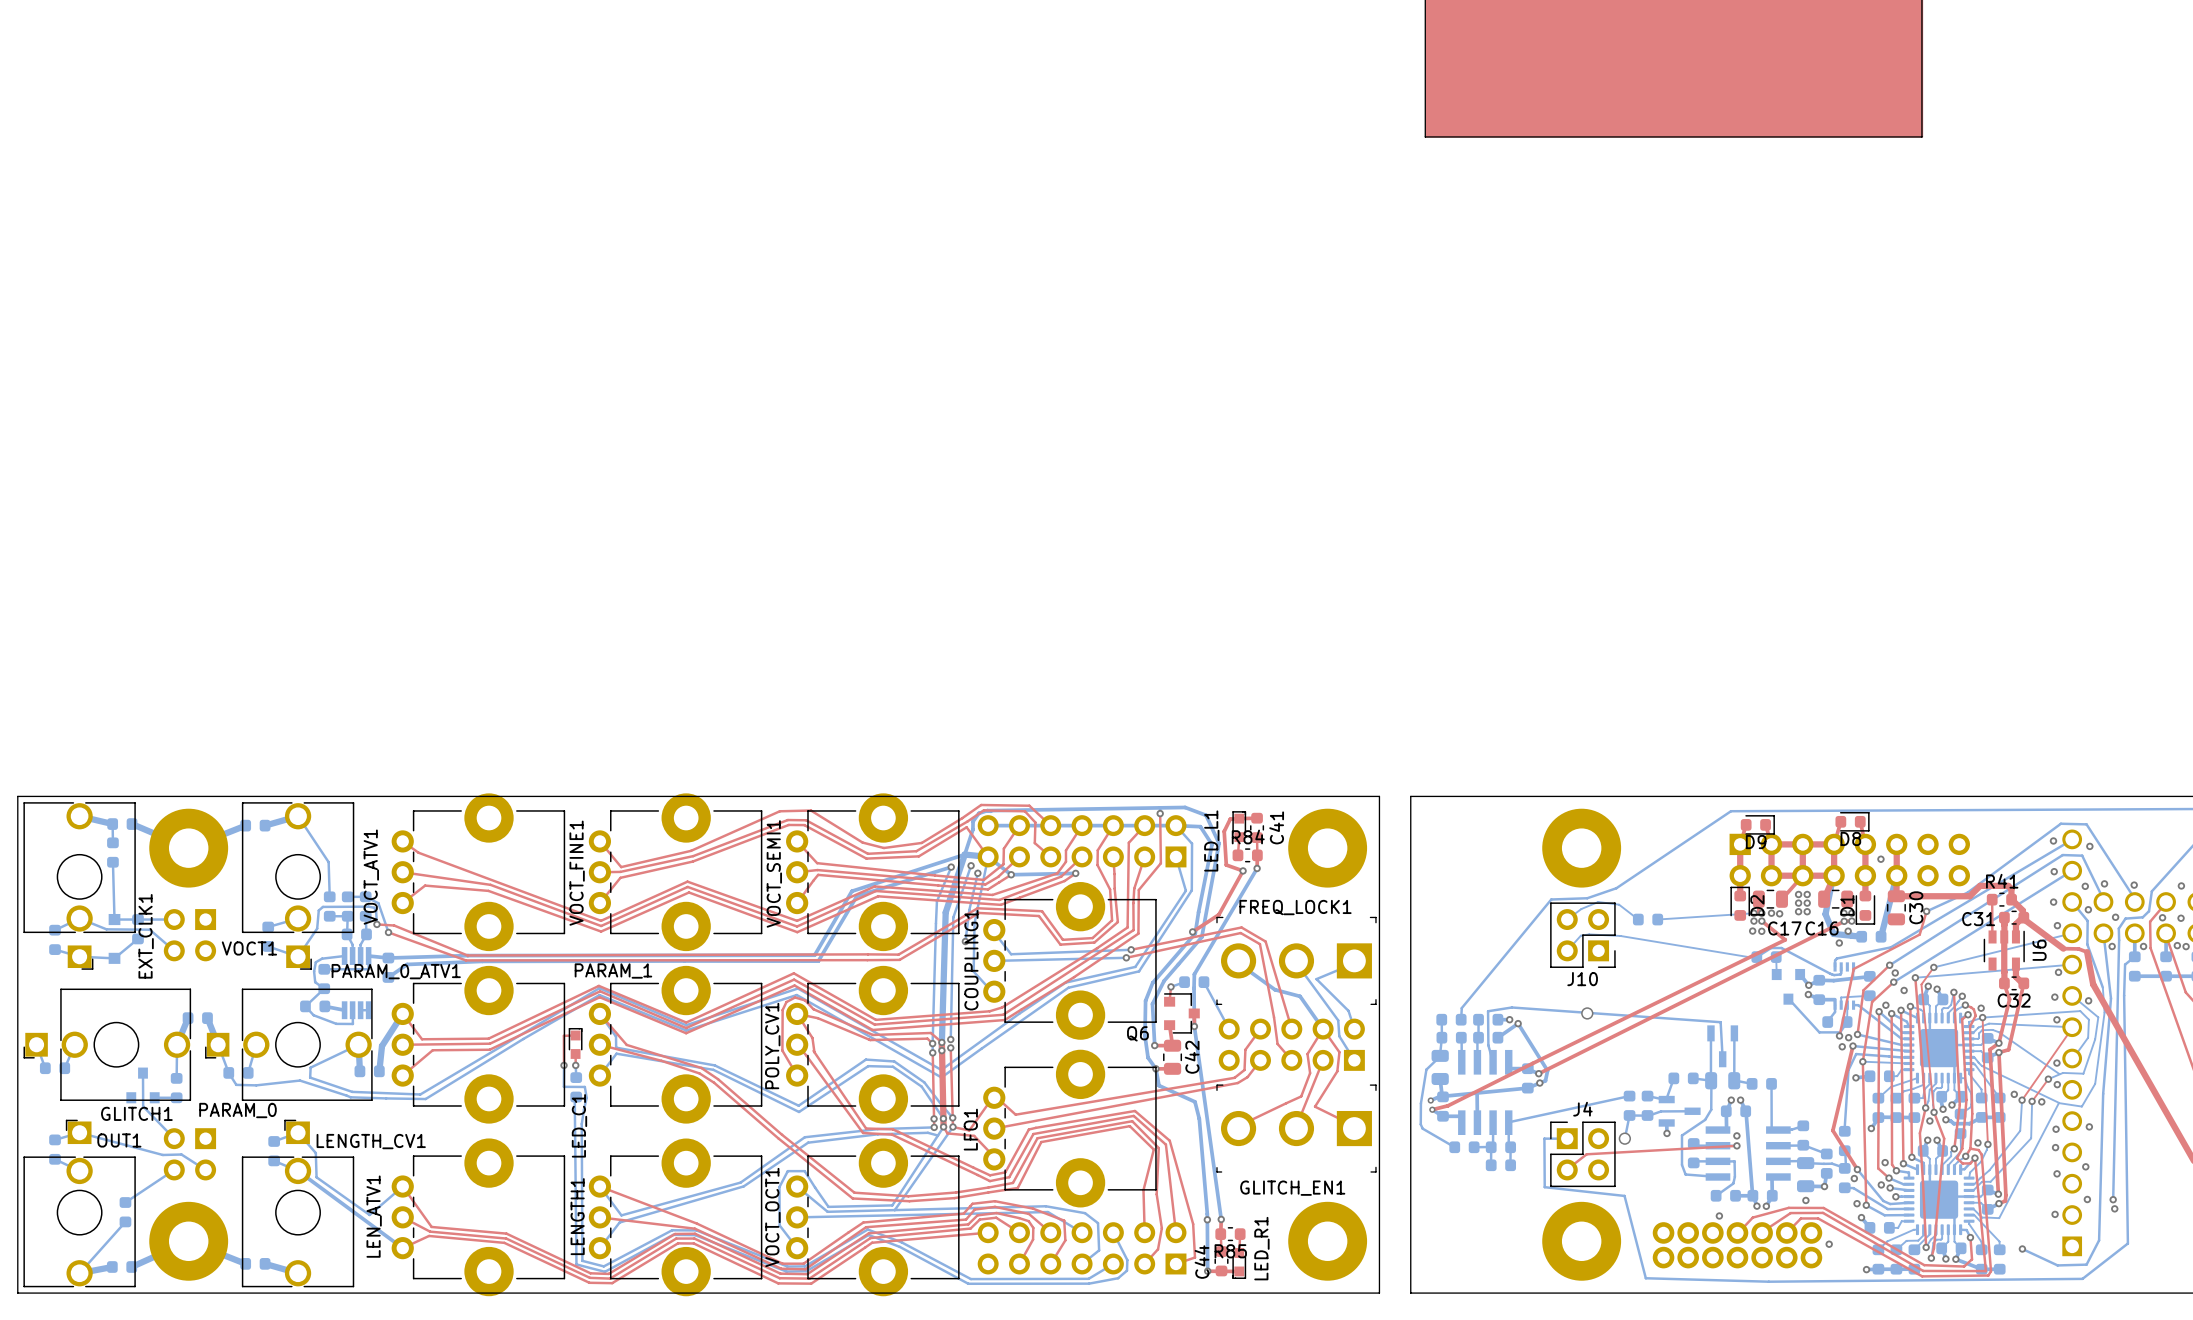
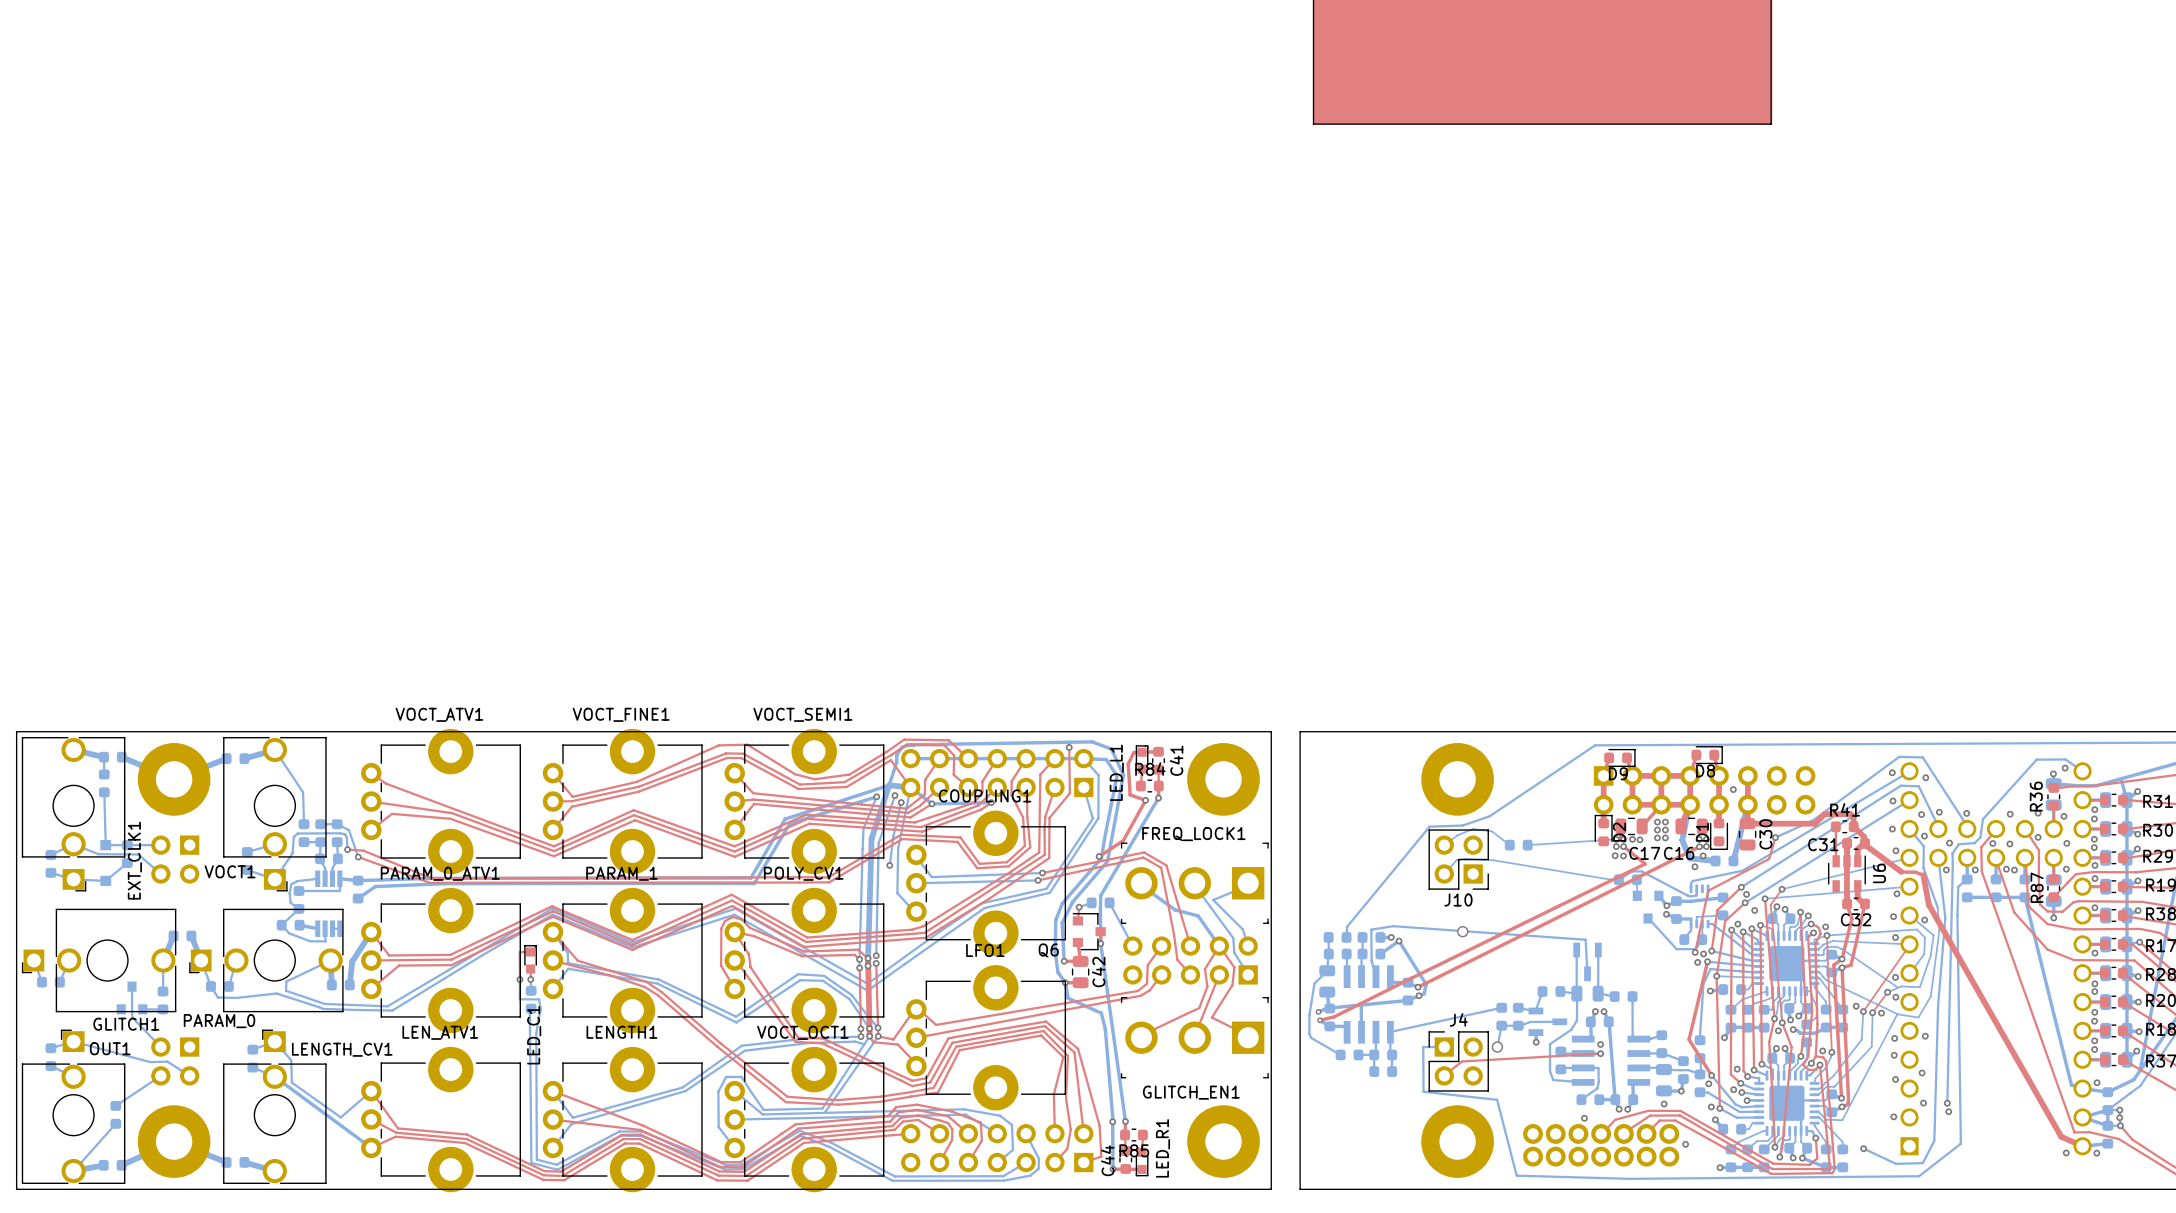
VOCT_FINE1 name rotation: 0° (577, 873) -> 90° clockwise (621, 714)
VOCT_FINE1 name position: VOCT_FINE1 (577, 873) -> VOCT_FINE1 (621, 714)
VOCT_SEMI1 name rotation: 0° (774, 873) -> 90° clockwise (802, 714)
VOCT_SEMI1 name position: VOCT_SEMI1 (774, 873) -> VOCT_SEMI1 (802, 714)
VOCT_ATV1 name rotation: 0° (371, 877) -> 90° clockwise (439, 714)
VOCT_ATV1 name position: VOCT_ATV1 (371, 877) -> VOCT_ATV1 (439, 714)
COUPLING1 name rotation: 0° (971, 960) -> 90° clockwise (985, 795)
COUPLING1 name position: COUPLING1 (971, 960) -> COUPLING1 (985, 795)
PARAM_1 name position: PARAM_1 (613, 970) -> PARAM_1 (621, 873)
PARAM_0_ATV1 name position: PARAM_0_ATV1 (396, 971) -> PARAM_0_ATV1 (440, 873)
POLY_CV1 name rotation: 0° (772, 1046) -> 90° clockwise (803, 873)
POLY_CV1 name position: POLY_CV1 (772, 1046) -> POLY_CV1 (803, 873)
LFO1 name rotation: 0° (970, 1129) -> 90° clockwise (985, 950)
LFO1 name position: LFO1 (970, 1129) -> LFO1 (985, 950)
LEN_ATV1 name rotation: 0° (374, 1216) -> 90° clockwise (440, 1032)
LEN_ATV1 name position: LEN_ATV1 (374, 1216) -> LEN_ATV1 (440, 1032)
LENGTH1 name rotation: 0° (577, 1216) -> 90° clockwise (621, 1032)
LENGTH1 name position: LENGTH1 (577, 1216) -> LENGTH1 (621, 1032)
VOCT_OCT1 name rotation: 0° (772, 1217) -> 90° clockwise (802, 1032)
VOCT_OCT1 name position: VOCT_OCT1 (772, 1217) -> VOCT_OCT1 (802, 1032)

